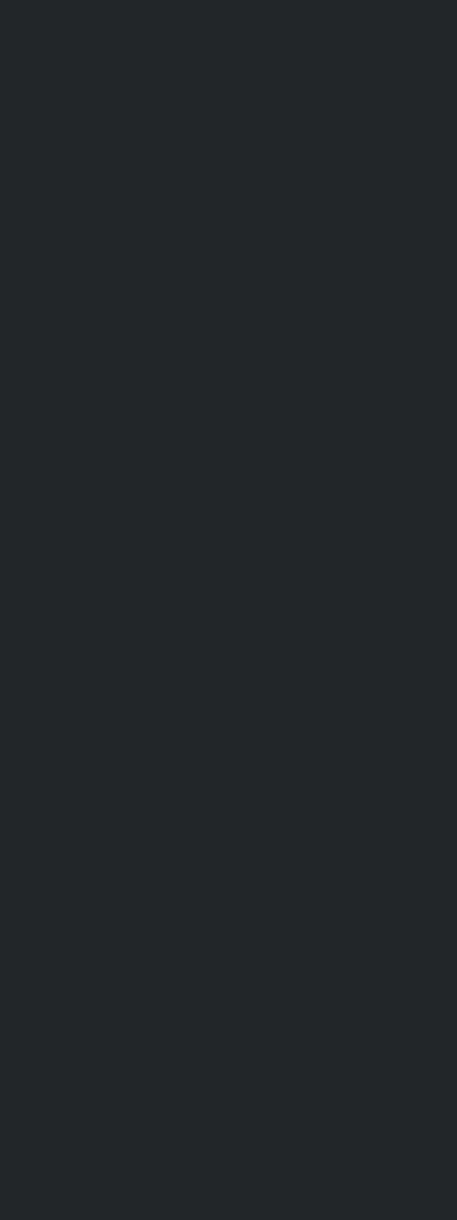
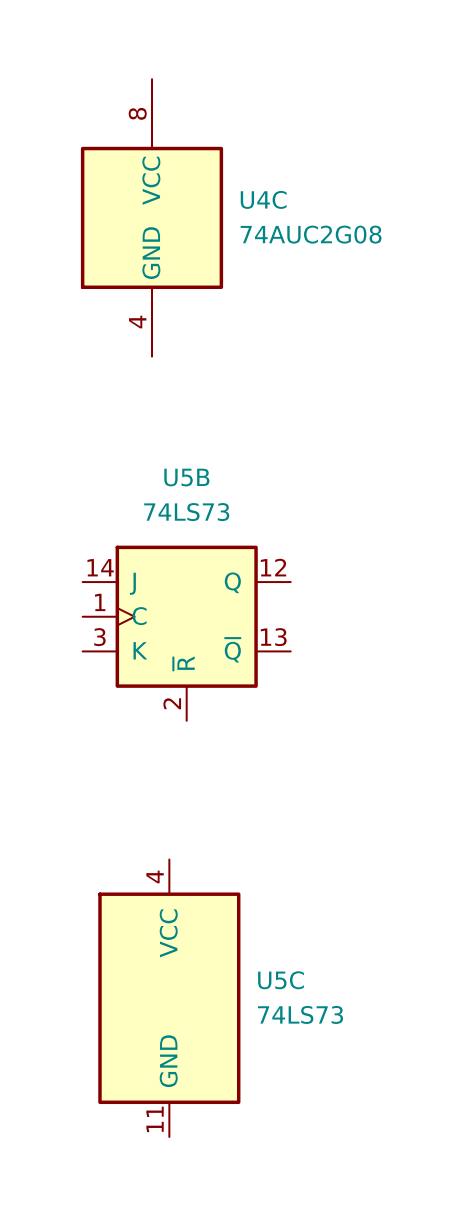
U4C: none -> 74AUC2G08 (152, 217)
U5B: none -> 74LS73 (186, 633)
U5C: none -> 74LS73 (169, 998)

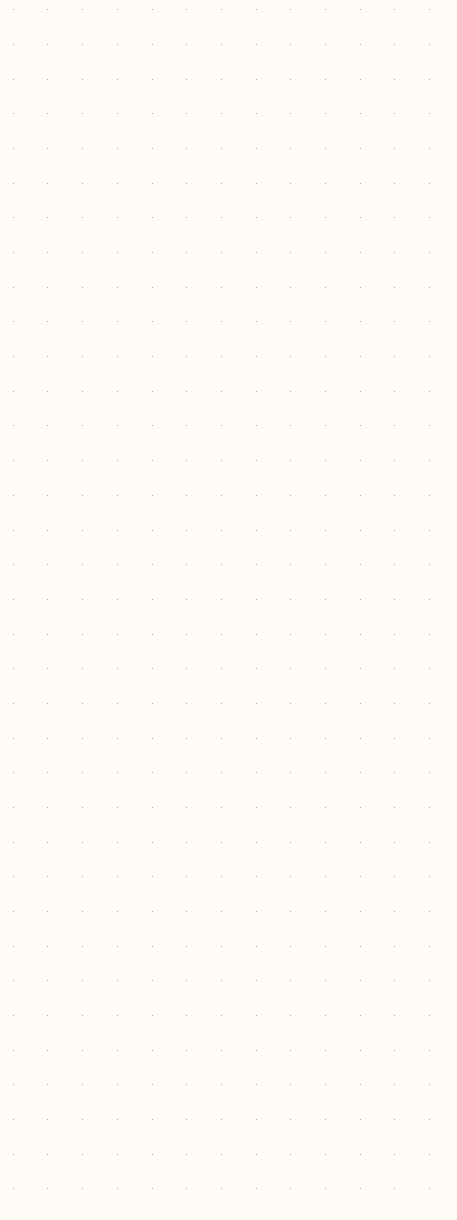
U4C: 74AUC2G08 (152, 217) -> none
U5B: 74LS73 (186, 633) -> none
U5C: 74LS73 (169, 998) -> none

